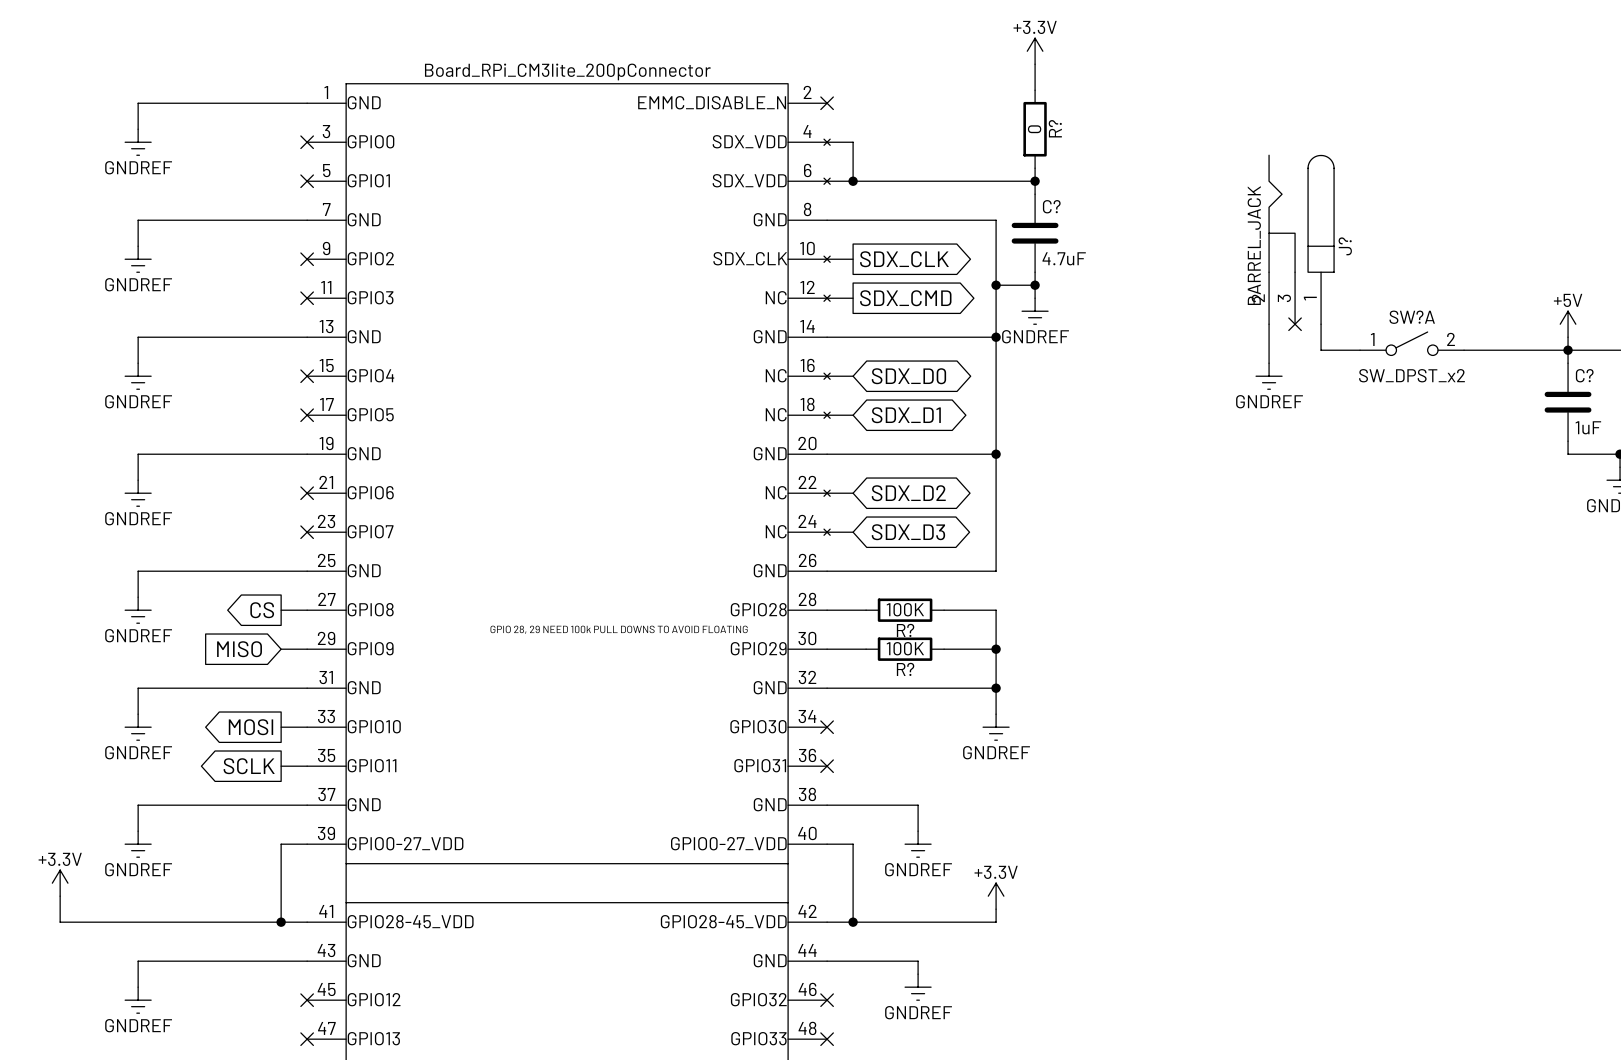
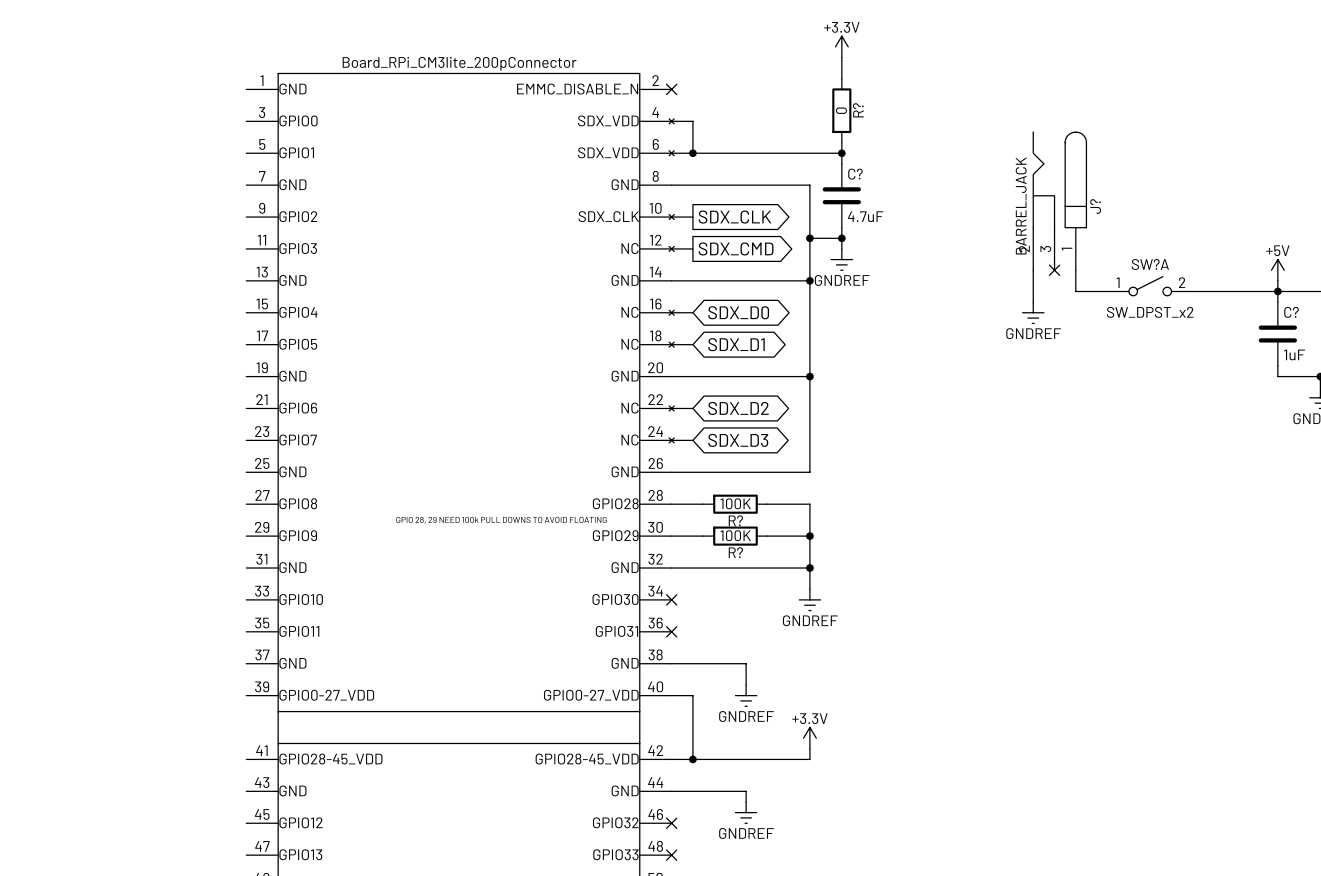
wire: (307, 103) (138, 103) (138, 129) -> none
power symbol: GNDREF (138, 142) -> none
no-connect mark: (307, 142) -> none
no-connect mark: (307, 181) -> none
wire: (307, 220) (138, 220) (138, 246) -> none
power symbol: GNDREF (138, 259) -> none
no-connect mark: (307, 259) -> none
no-connect mark: (307, 298) -> none
wire: (307, 337) (138, 337) (138, 363) -> none
power symbol: GNDREF (138, 376) -> none
no-connect mark: (307, 376) -> none
no-connect mark: (307, 415) -> none
wire: (307, 454) (138, 454) (138, 480) -> none
power symbol: GNDREF (138, 493) -> none
no-connect mark: (307, 493) -> none
no-connect mark: (307, 532) -> none
wire: (307, 571) (138, 571) (138, 597) -> none
power symbol: GNDREF (138, 610) -> none
global label: CS (262, 610) -> none
wire: (281, 610) (307, 610) -> none
global label: MISO (239, 649) -> none
wire: (281, 649) (307, 649) -> none
wire: (307, 688) (138, 688) (138, 714) -> none
power symbol: GNDREF (138, 727) -> none
global label: MOSI (250, 727) -> none
wire: (281, 727) (307, 727) -> none
global label: SCLK (249, 766) -> none
wire: (281, 766) (307, 766) -> none
wire: (307, 805) (138, 805) (138, 831) -> none
power symbol: GNDREF (138, 844) -> none
wire: (307, 844) (281, 844) (281, 922) -> none
power symbol: +3.3V (60, 883) -> none
wire: (60, 896) (60, 922) (307, 922) -> none
junction: (281, 922) -> none
wire: (307, 961) (138, 961) (138, 987) -> none
power symbol: GNDREF (138, 1000) -> none
no-connect mark: (307, 1000) -> none
no-connect mark: (307, 1039) -> none

